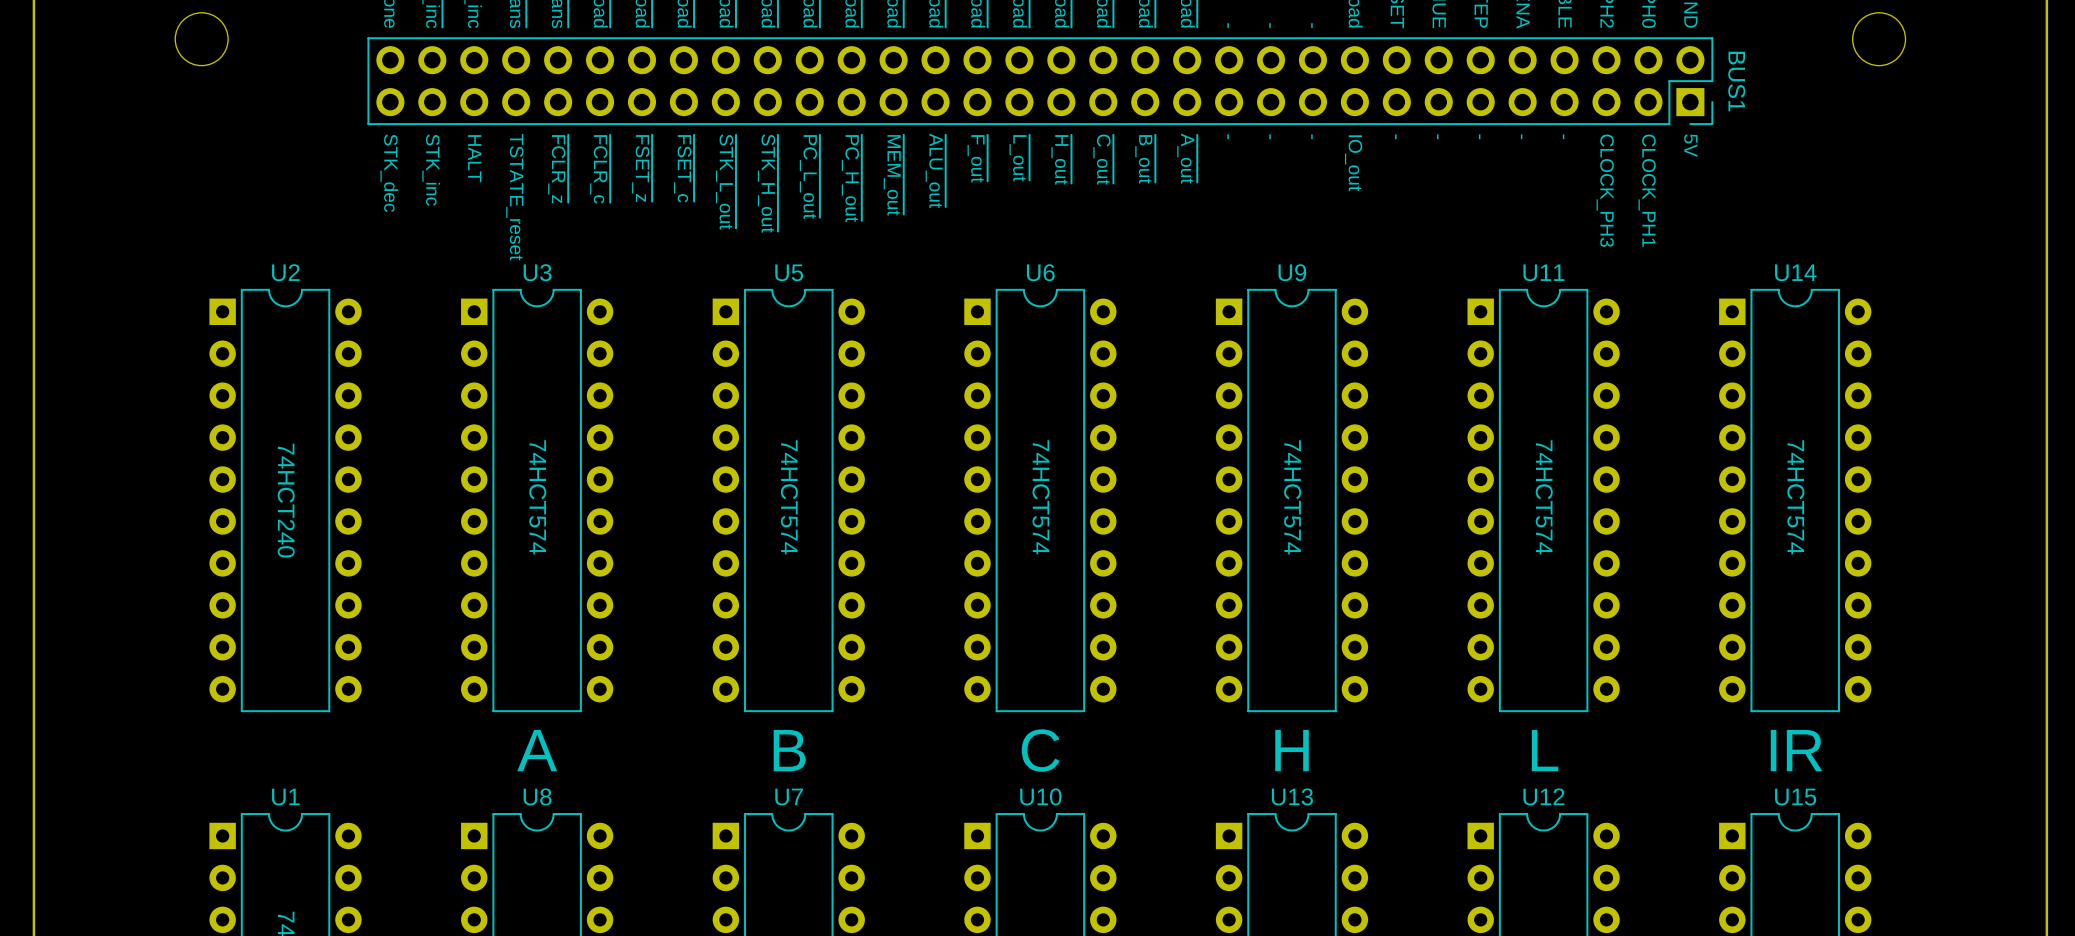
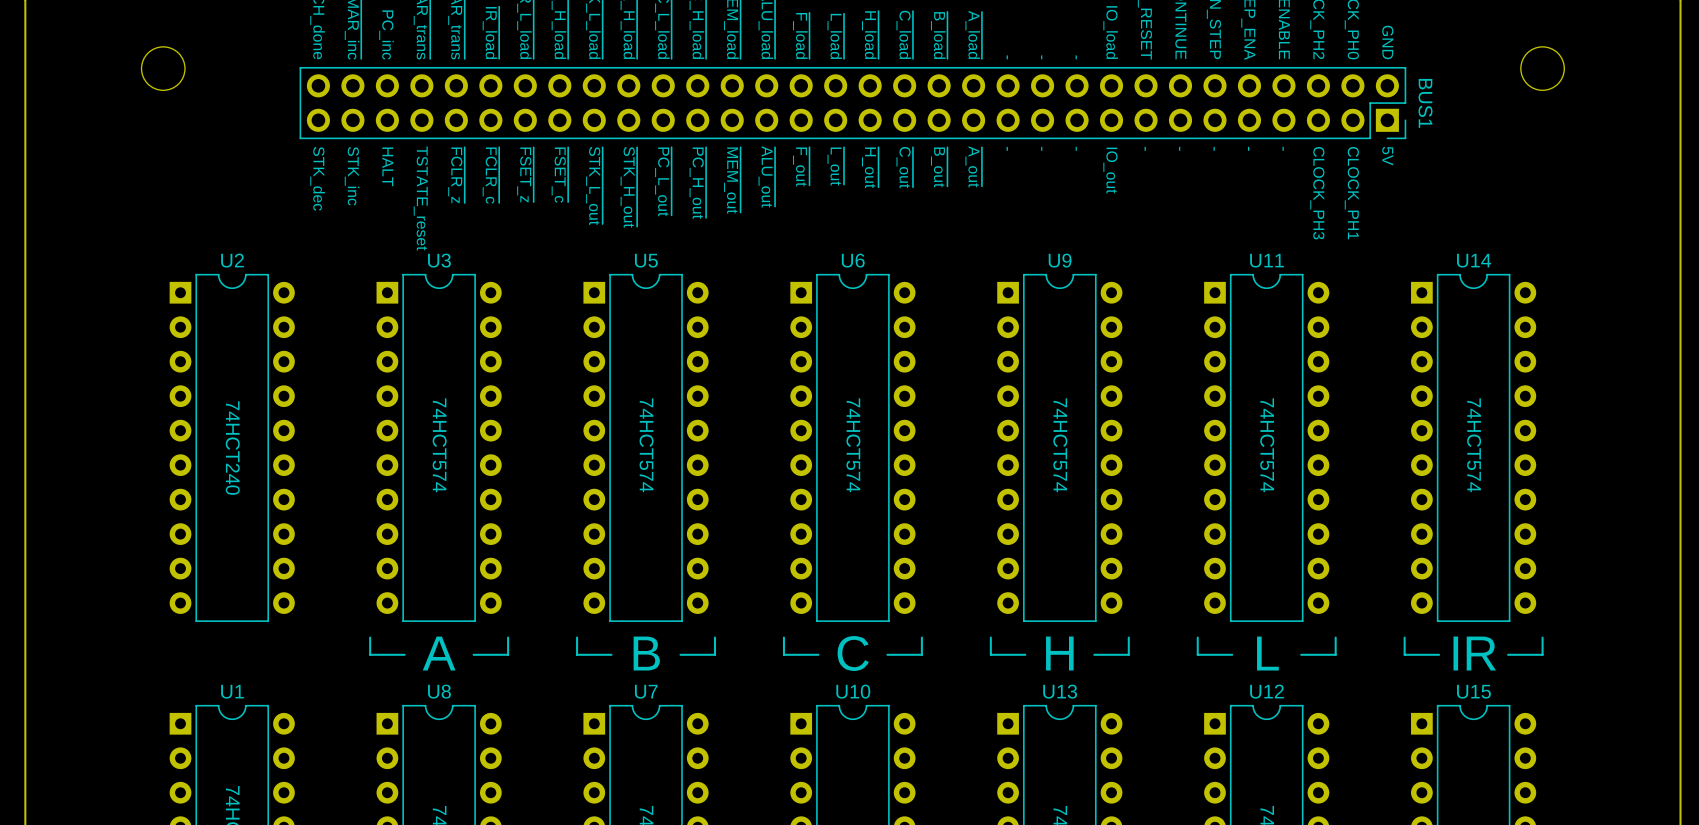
line: none -> (370, 637) (370, 654) (404, 654)
line: none -> (508, 637) (508, 654) (473, 654)
line: none -> (577, 637) (577, 654) (611, 654)
line: none -> (714, 637) (714, 654) (680, 654)
line: none -> (783, 637) (783, 654) (818, 654)
line: none -> (921, 637) (921, 654) (887, 654)
line: none -> (990, 637) (990, 654) (1025, 654)
line: none -> (1128, 637) (1128, 654) (1094, 654)
line: none -> (1197, 637) (1197, 654) (1232, 654)
line: none -> (1335, 637) (1335, 654) (1301, 654)
line: none -> (1404, 637) (1404, 654) (1439, 654)
line: none -> (1542, 637) (1542, 654) (1508, 654)

